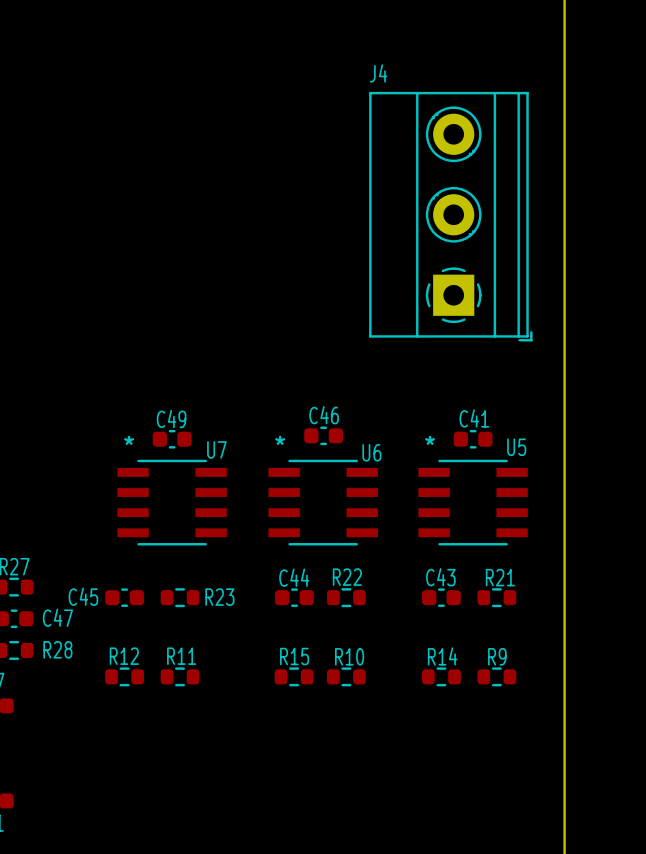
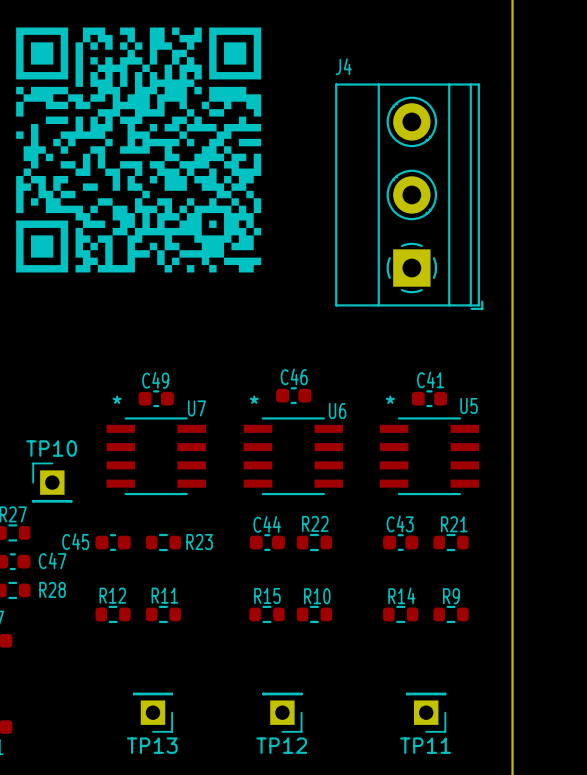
drawing: none -> [16, 27, 262, 273]
TP10: none -> (52, 482)
TP13: none -> (152, 712)
TP12: none -> (282, 712)
TP11: none -> (426, 712)

